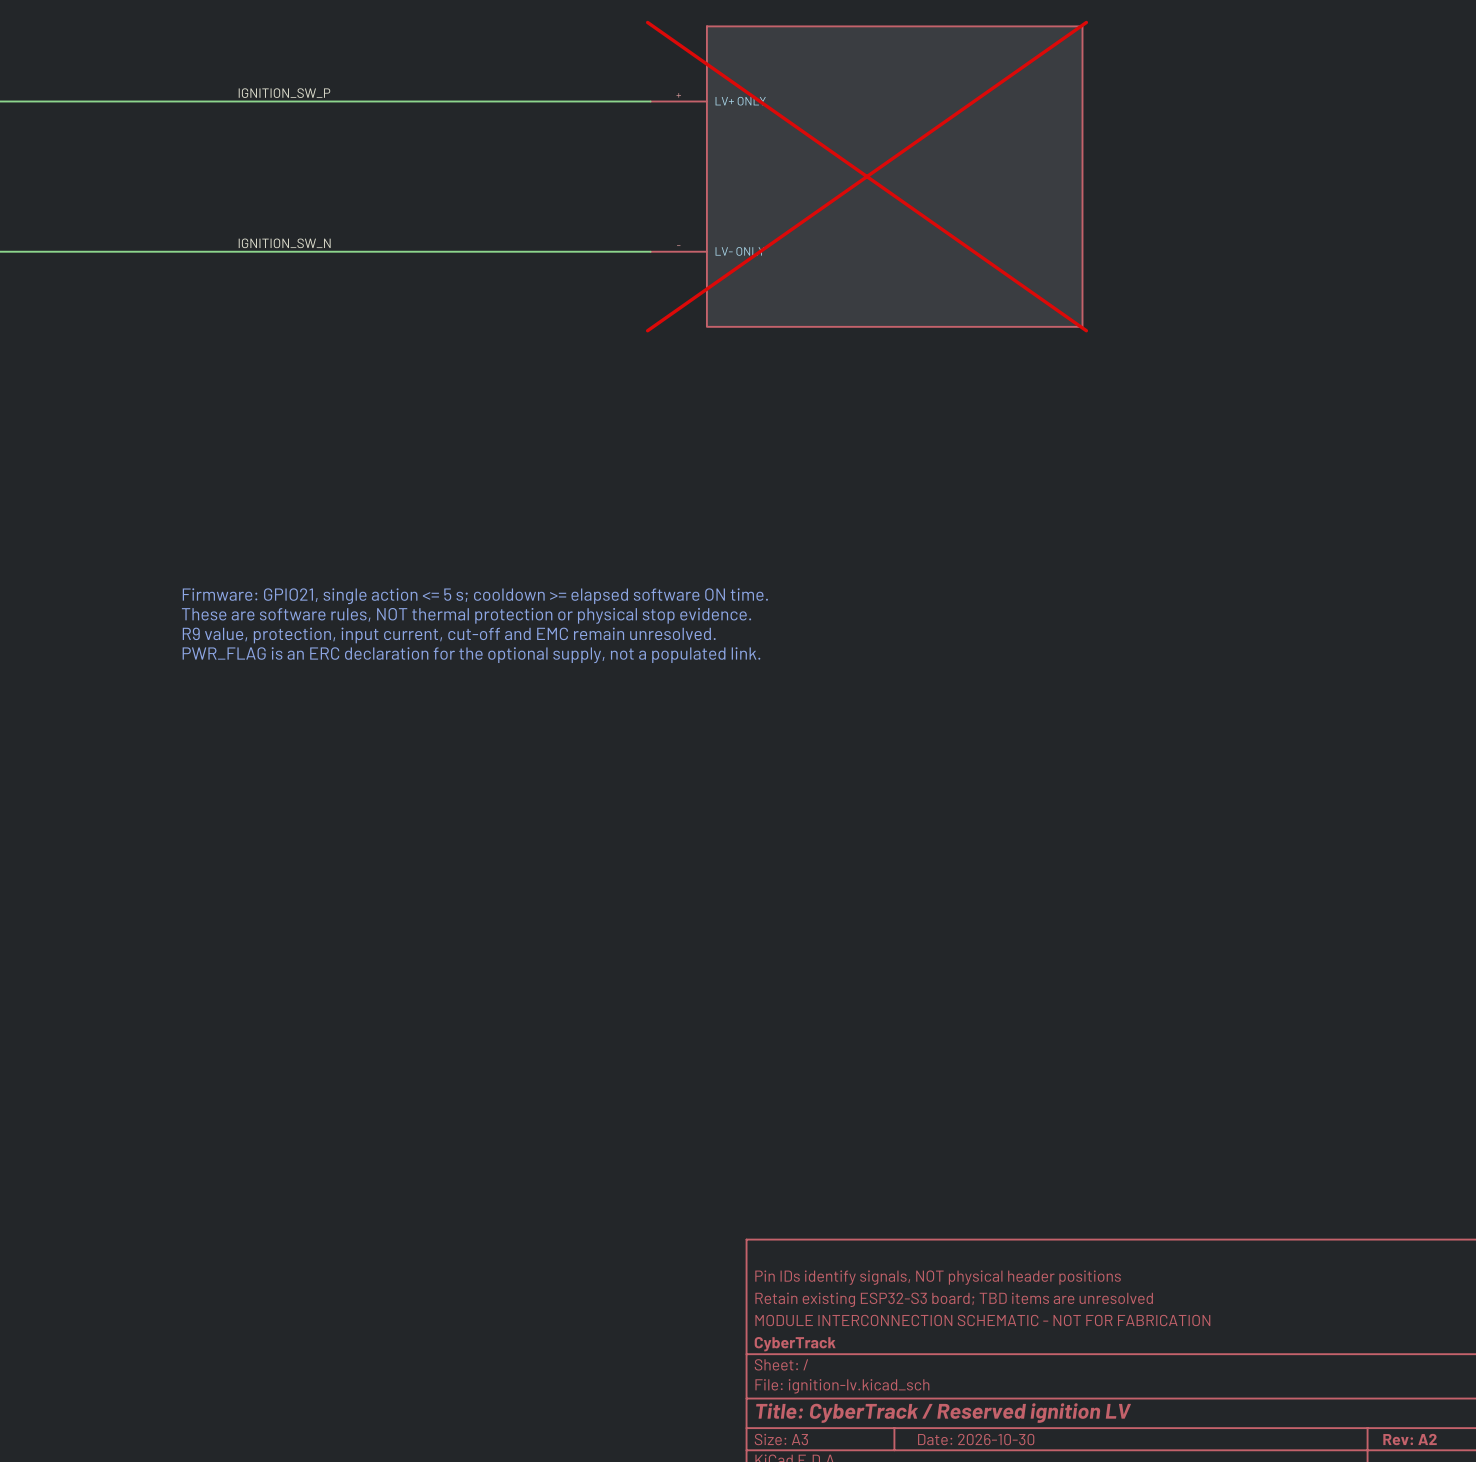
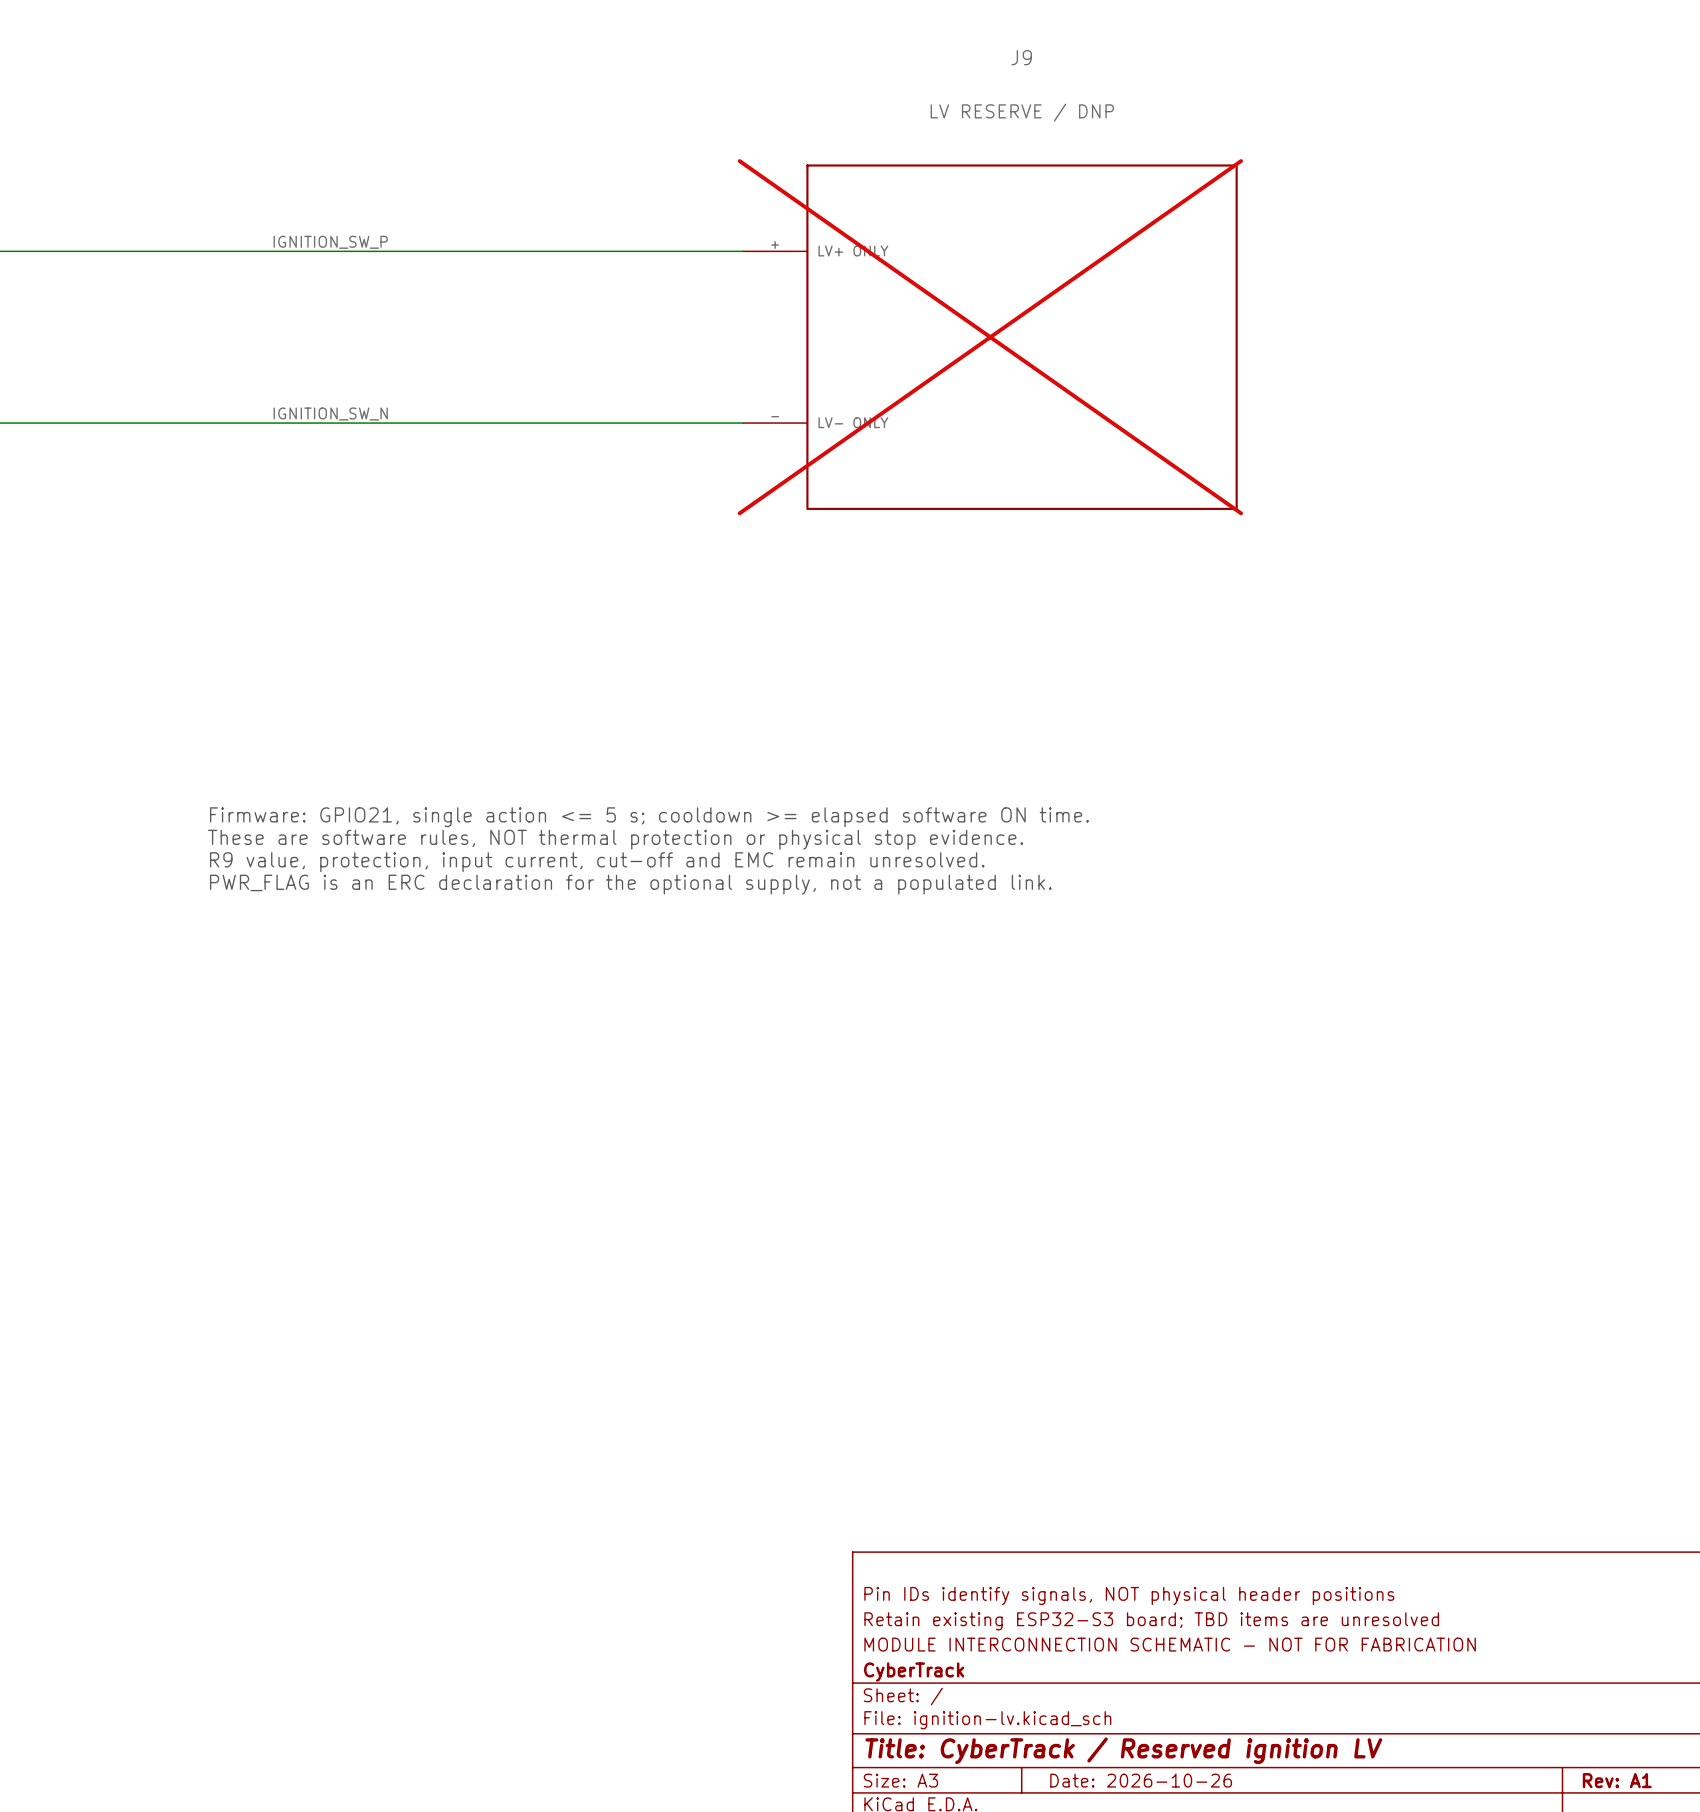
title block: Date: 2026-10-30 (976, 1439) -> Date: 2026-10-26 (1141, 1780)
title block: Rev: A2 (1410, 1439) -> Rev: A1 (1617, 1780)

